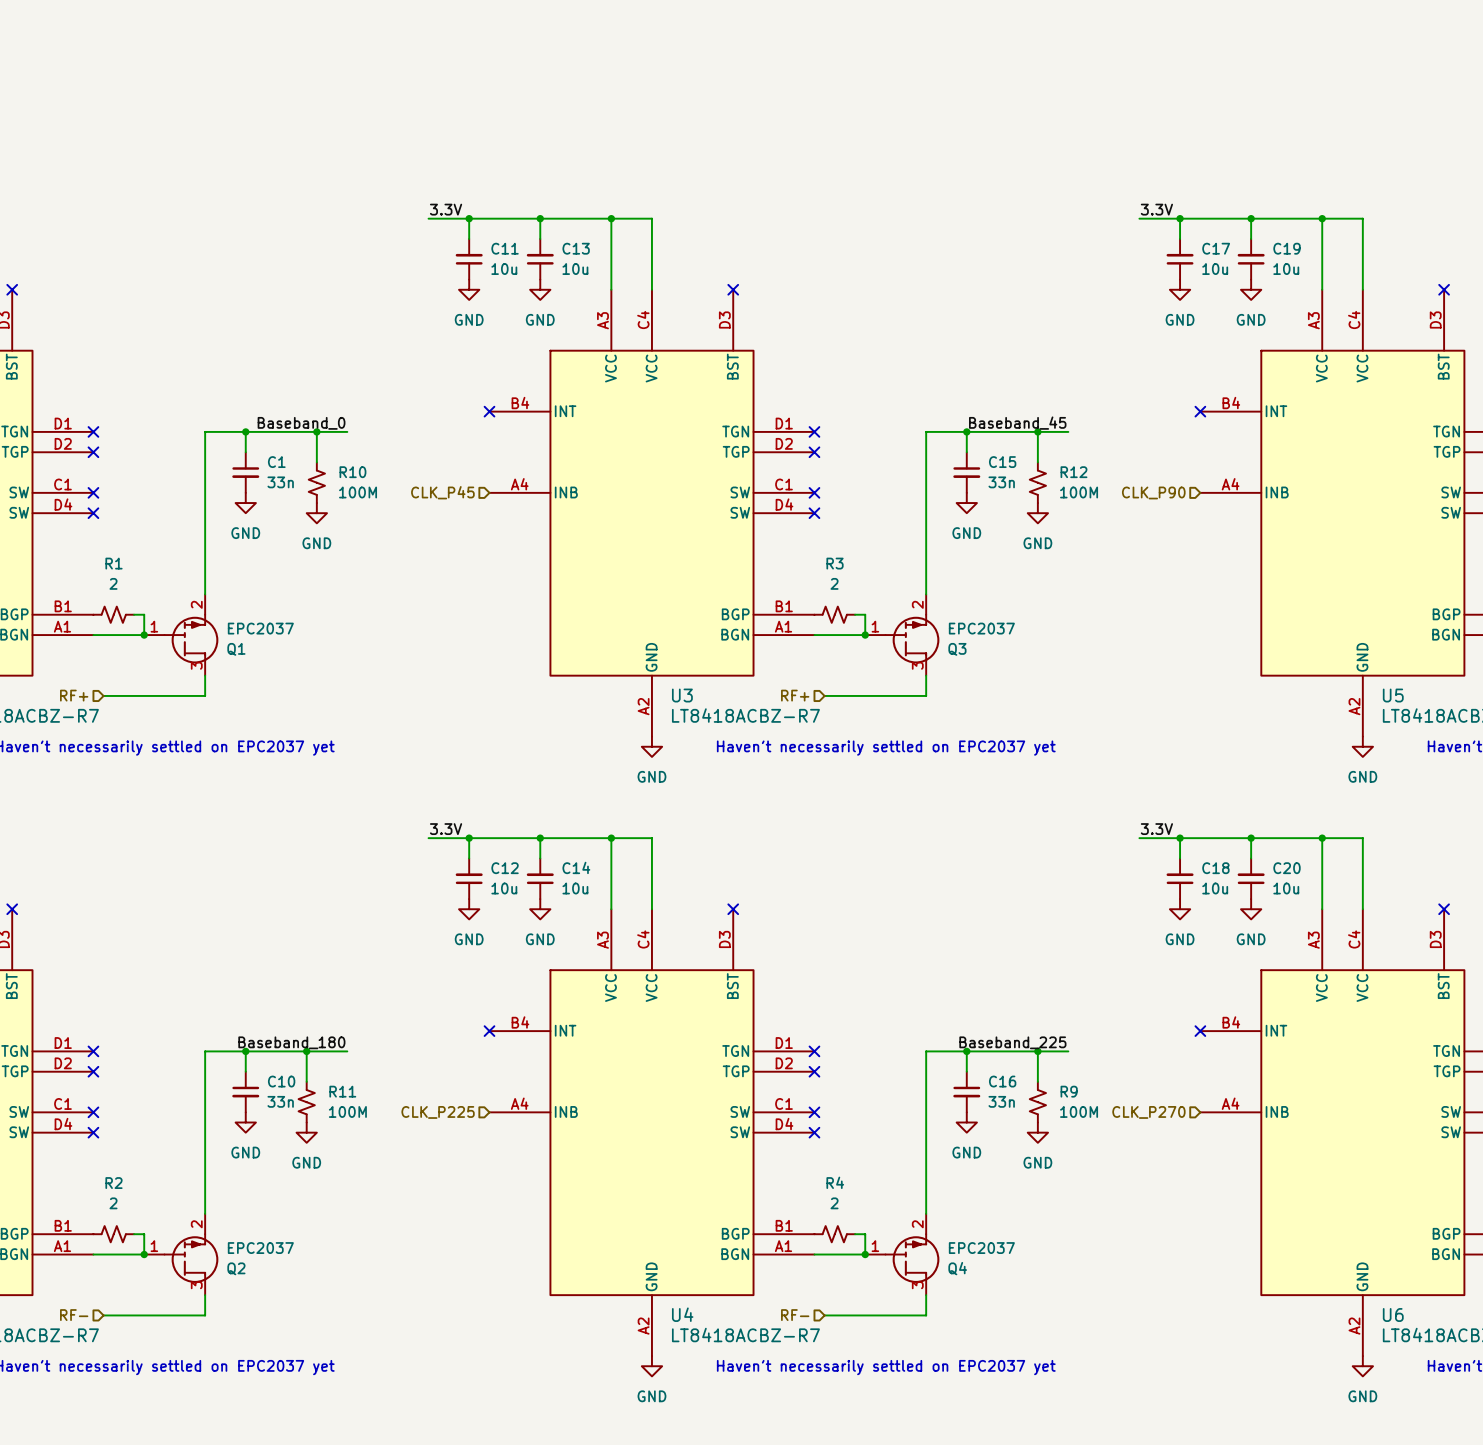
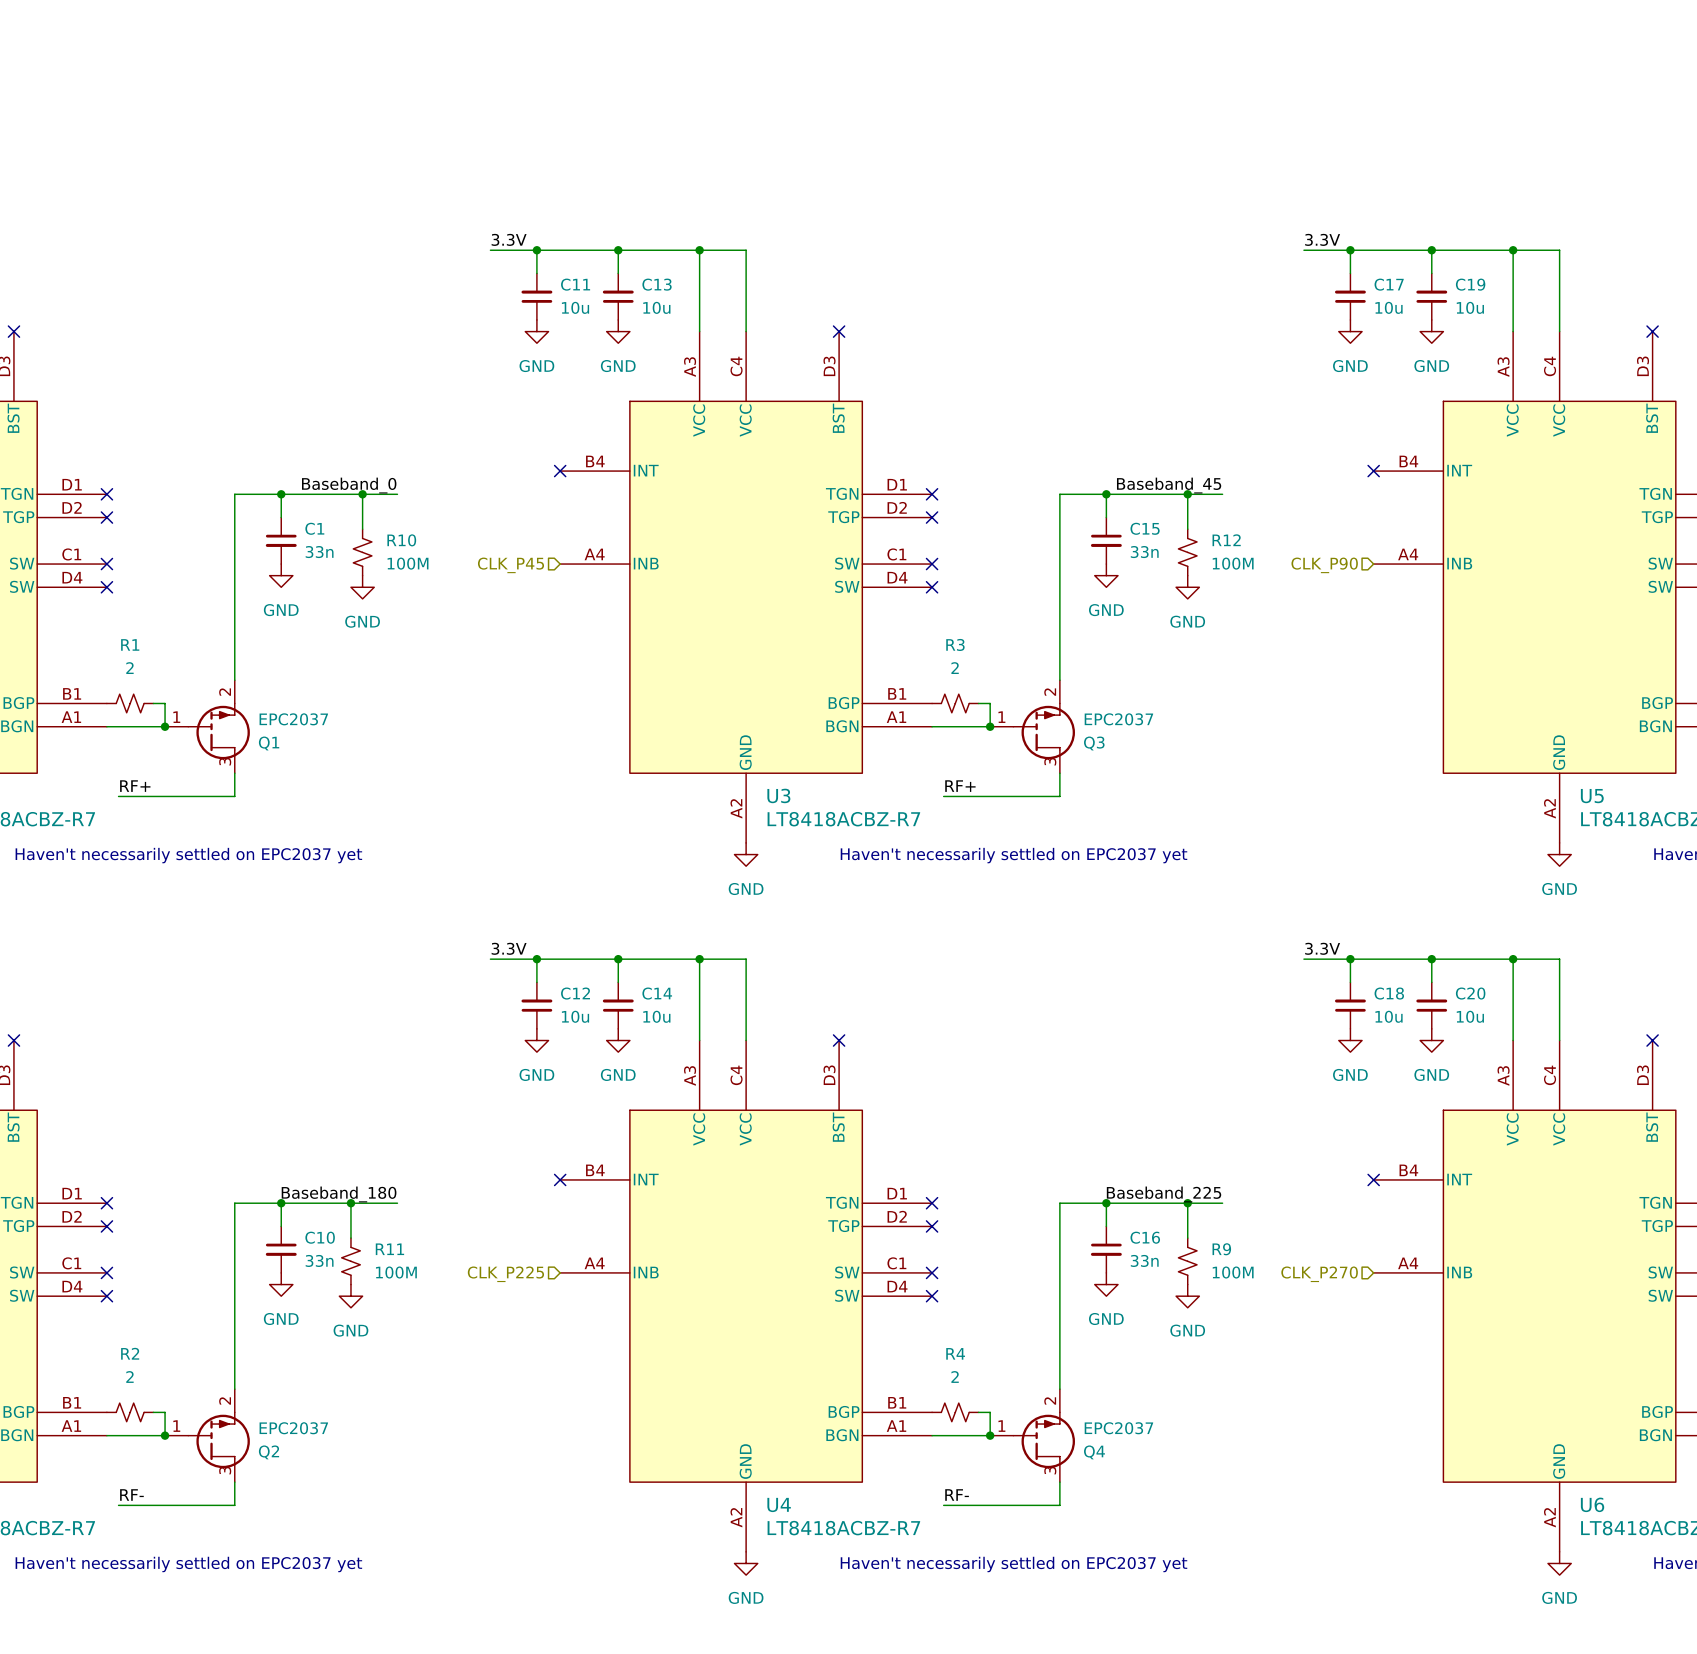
label: none -> RF+ (135, 786)
label: none -> RF+ (960, 786)
hierarchical label: RF+ (74, 695) -> none
hierarchical label: RF+ (795, 695) -> none
label: none -> RF- (131, 1495)
label: none -> RF- (957, 1495)
hierarchical label: RF- (74, 1315) -> none
hierarchical label: RF- (795, 1315) -> none

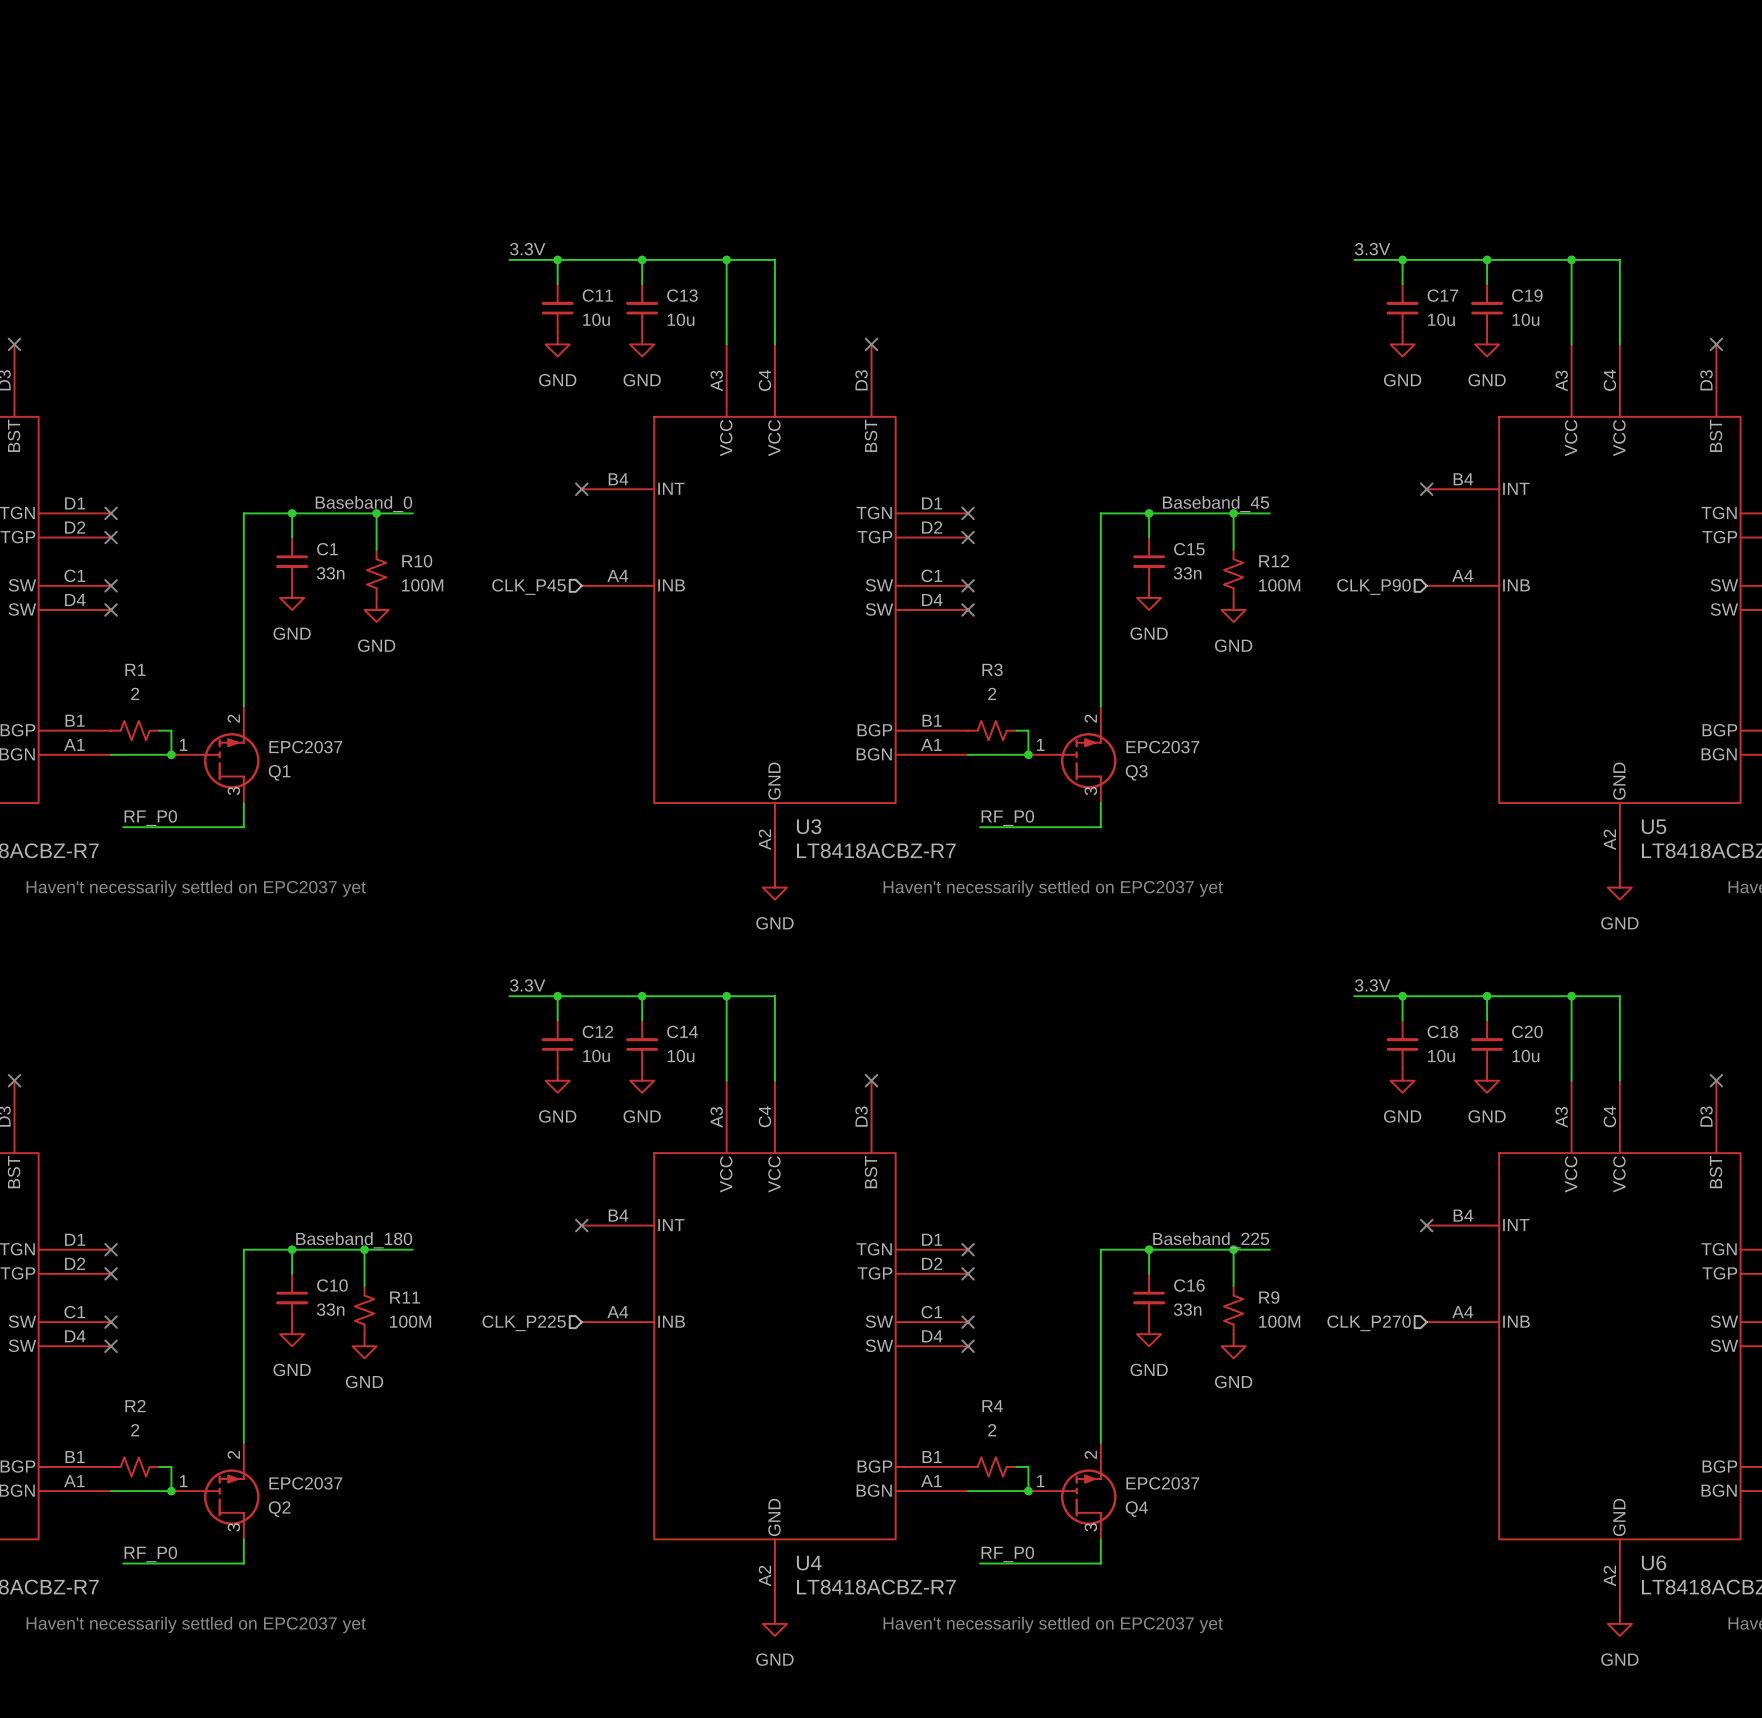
label: RF+ (135, 786) -> RF_P0 (150, 818)
label: RF+ (960, 786) -> RF_P0 (1007, 818)
label: RF- (131, 1495) -> RF_P0 (150, 1554)
label: RF- (957, 1495) -> RF_P0 (1007, 1554)

